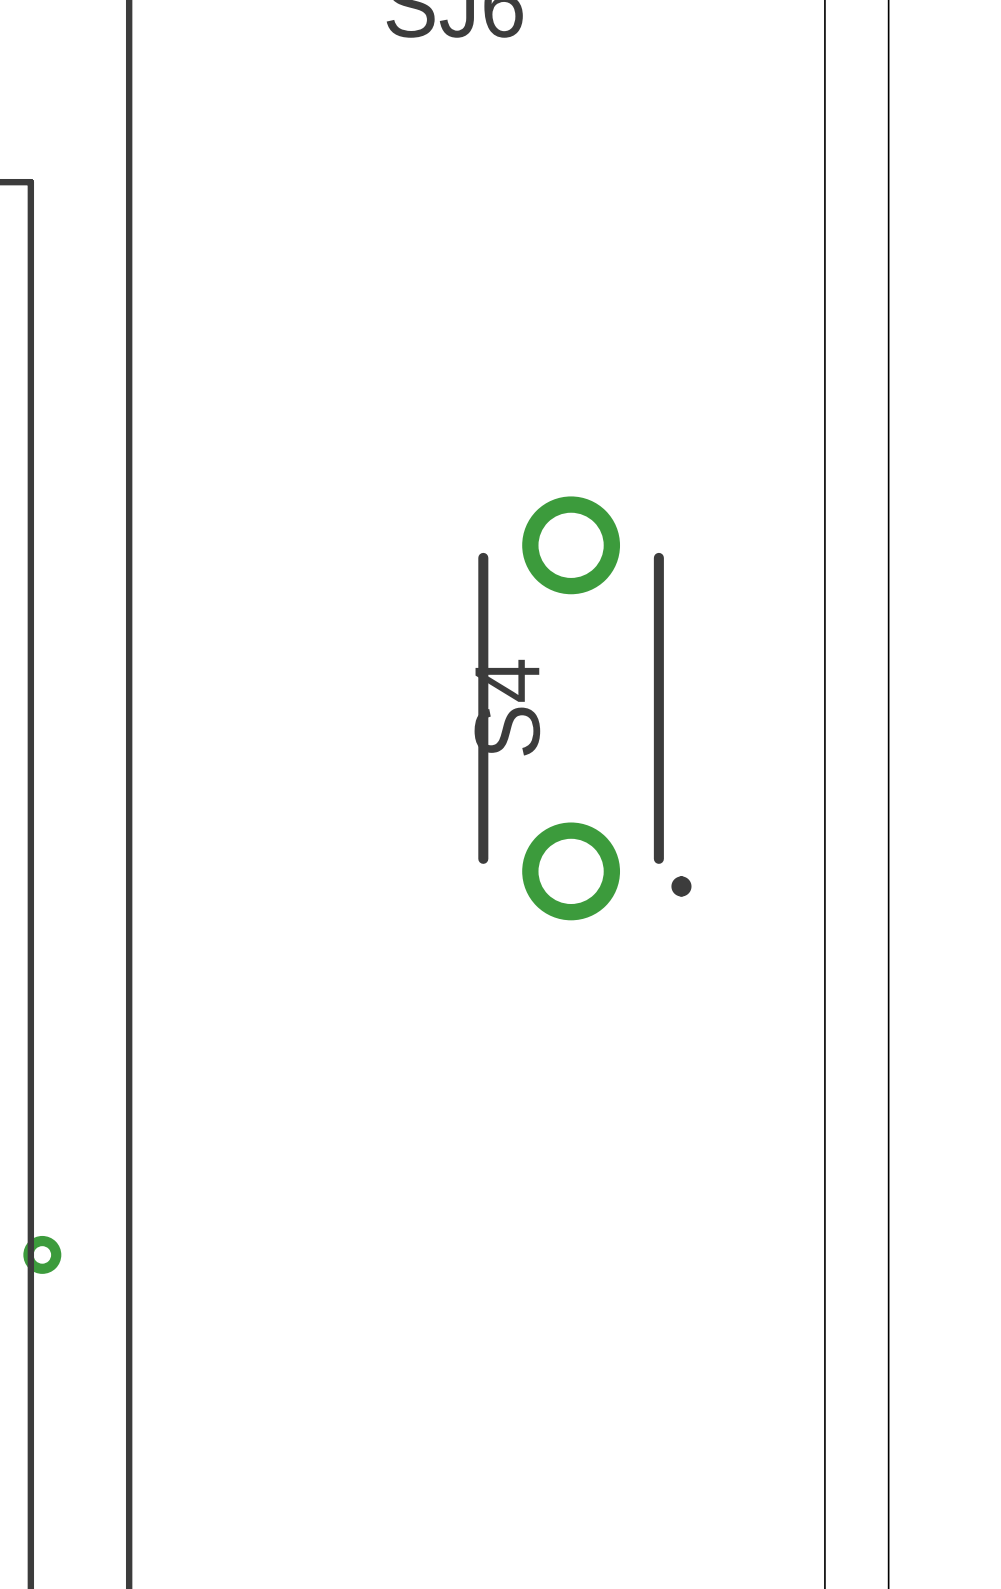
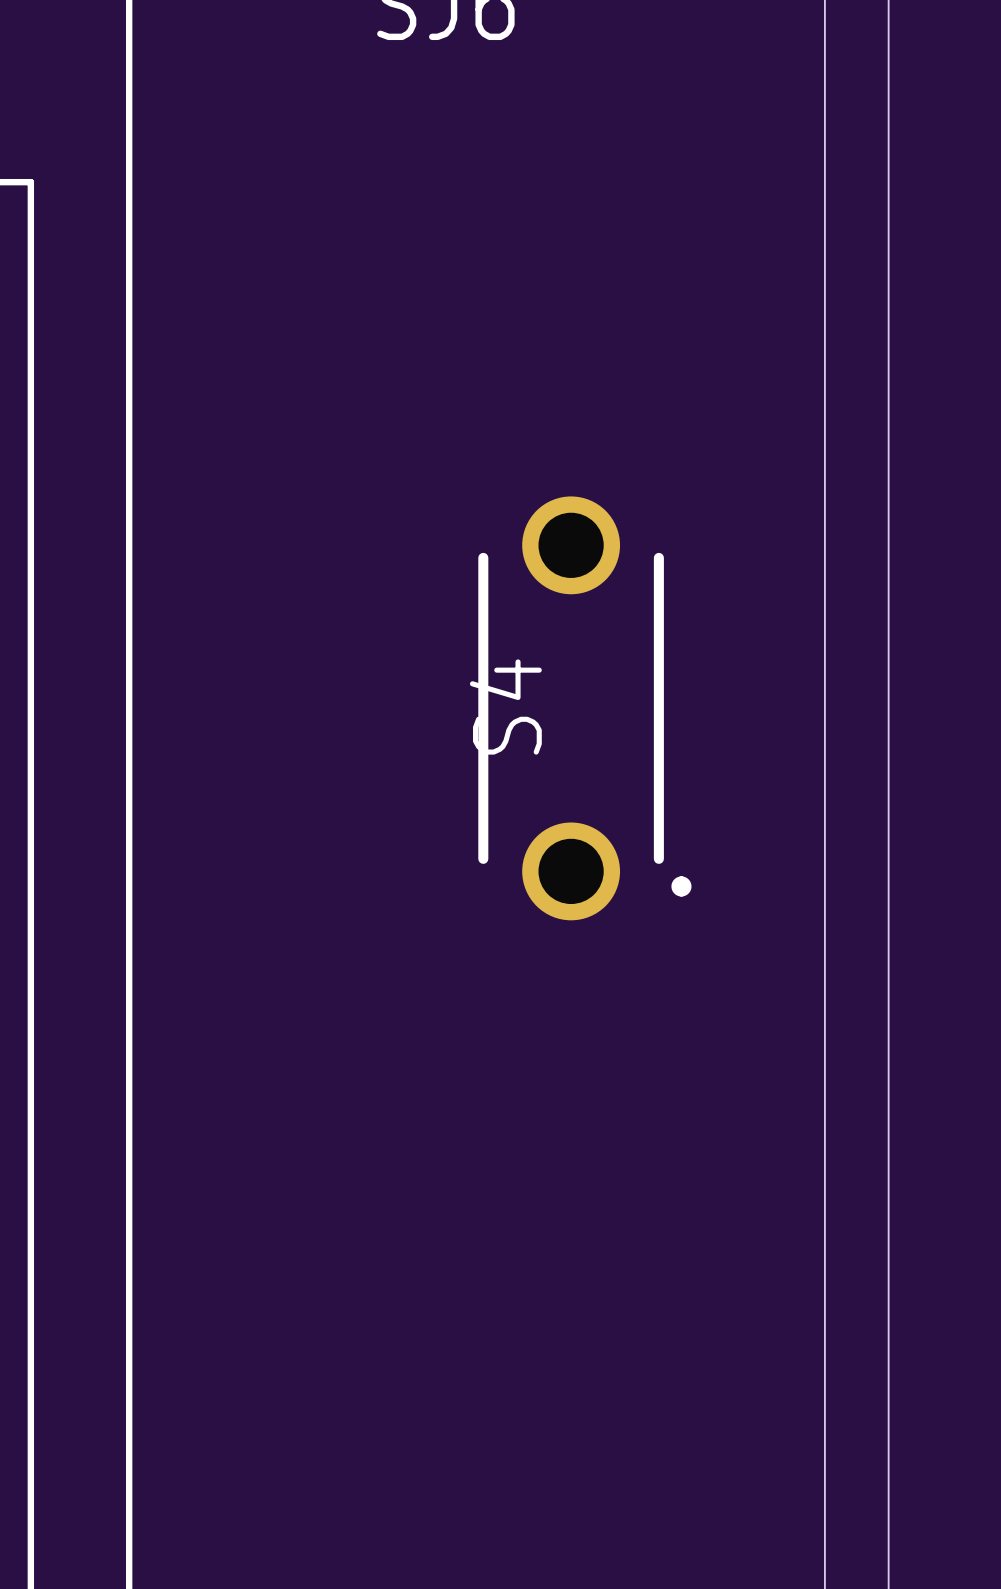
via: (42, 1254) -> none

